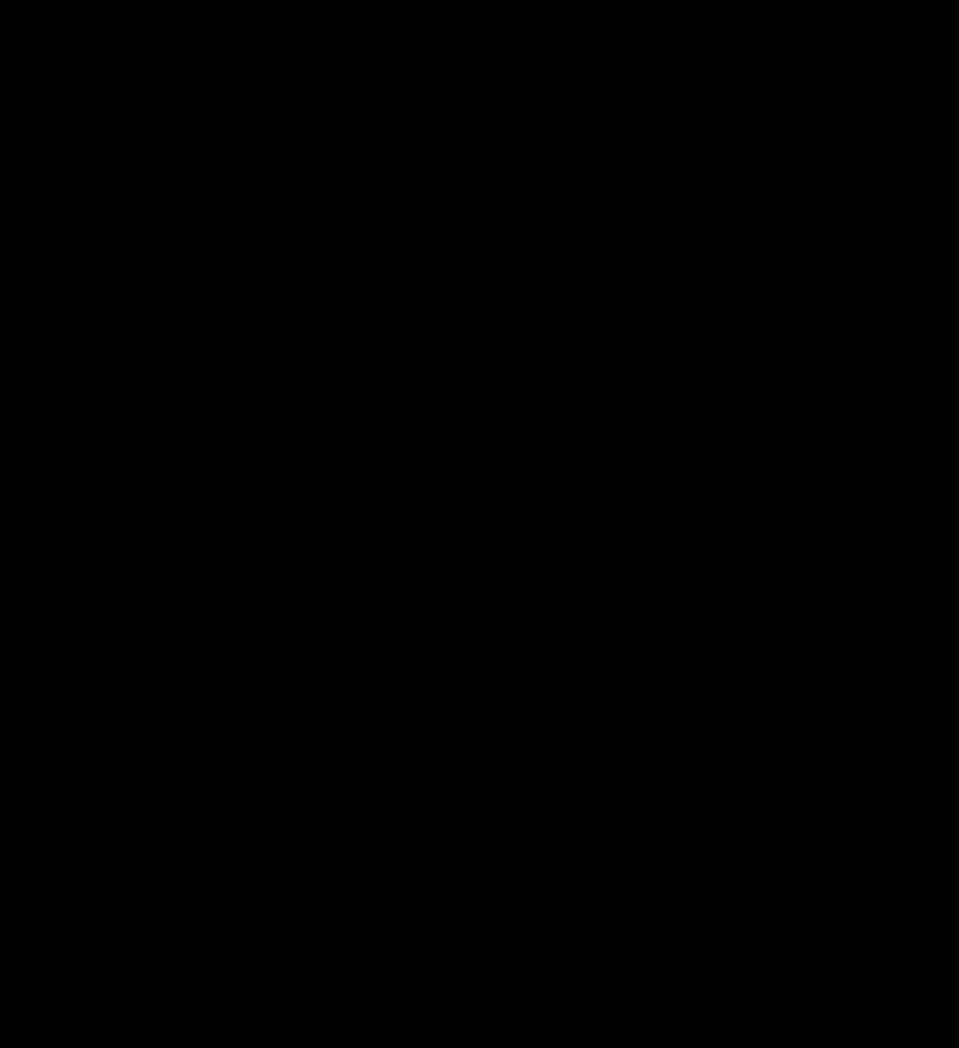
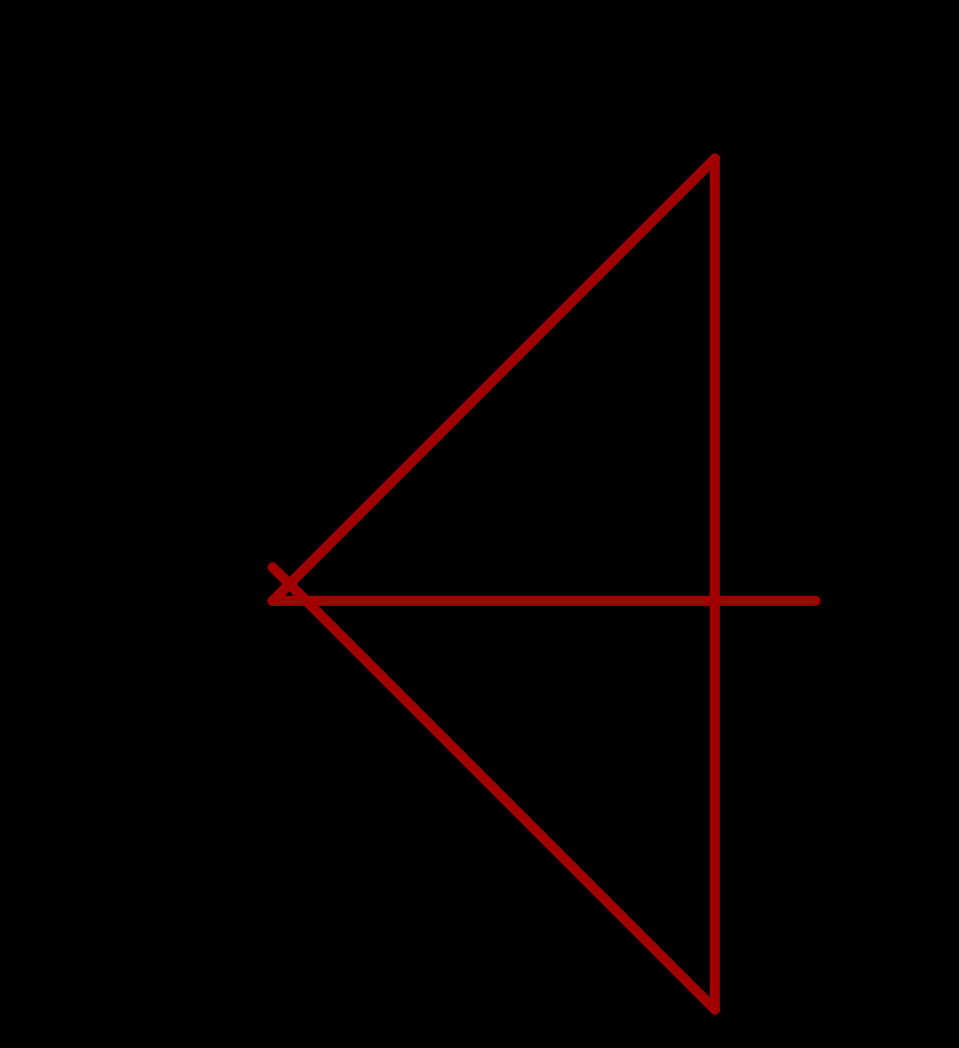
top track: none -> (272, 567) (714, 1009) (714, 158) (272, 600) (815, 600)

